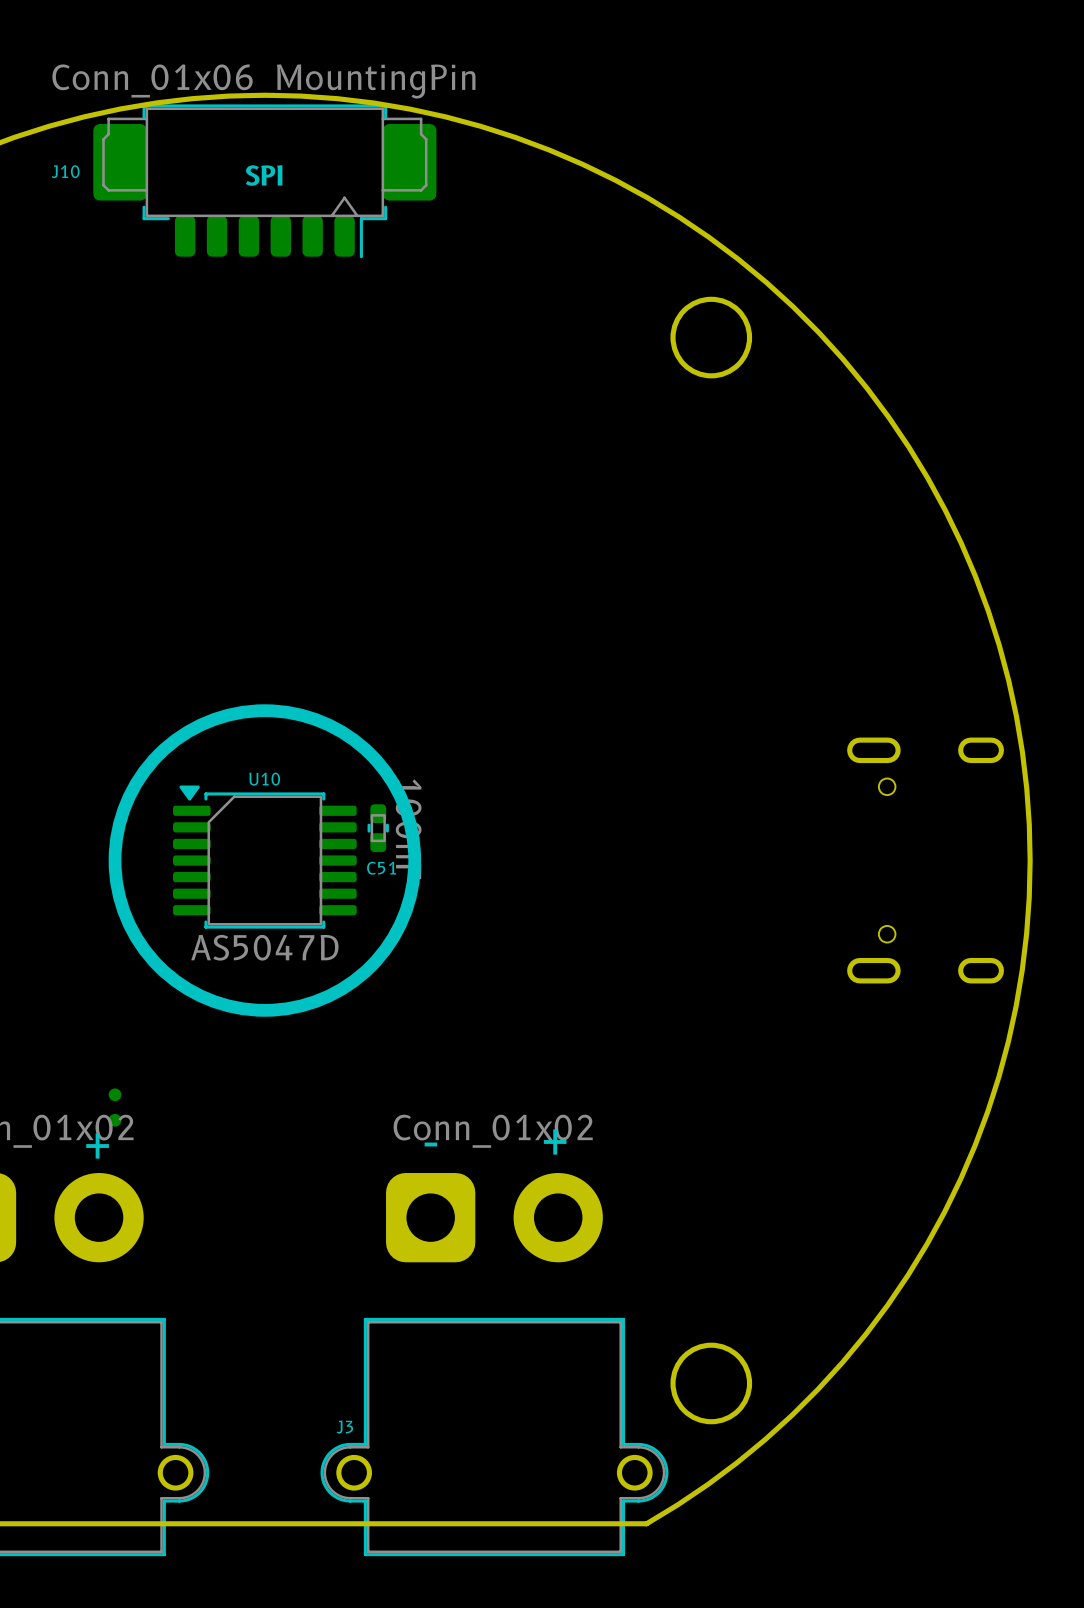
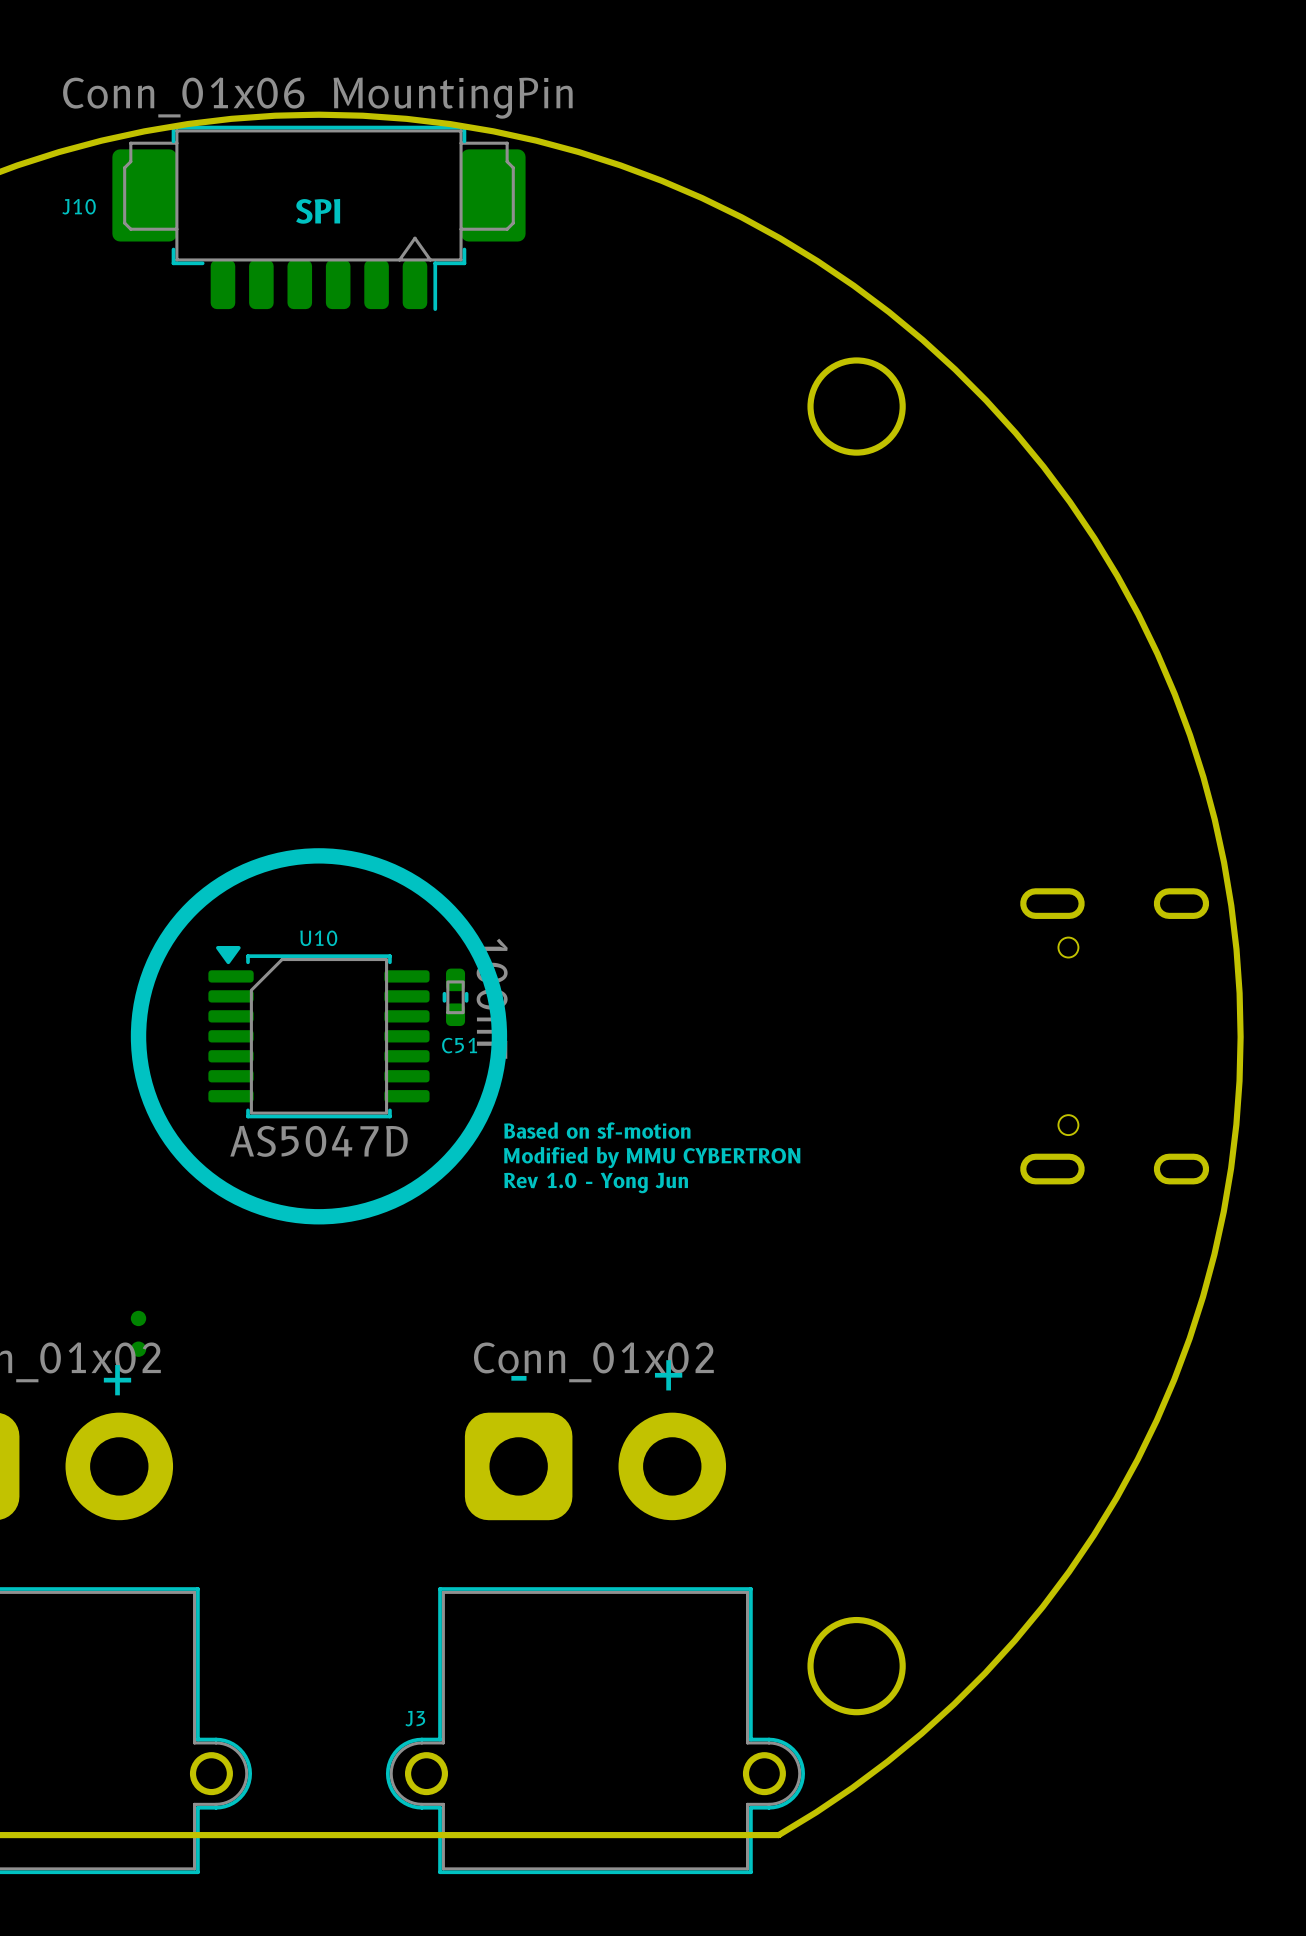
text: none -> Based on sf-motion (597, 1130)
text: none -> Modified by MMU CYBERTRON (652, 1157)
text: none -> Rev 1.0 - Yong Jun (596, 1182)

